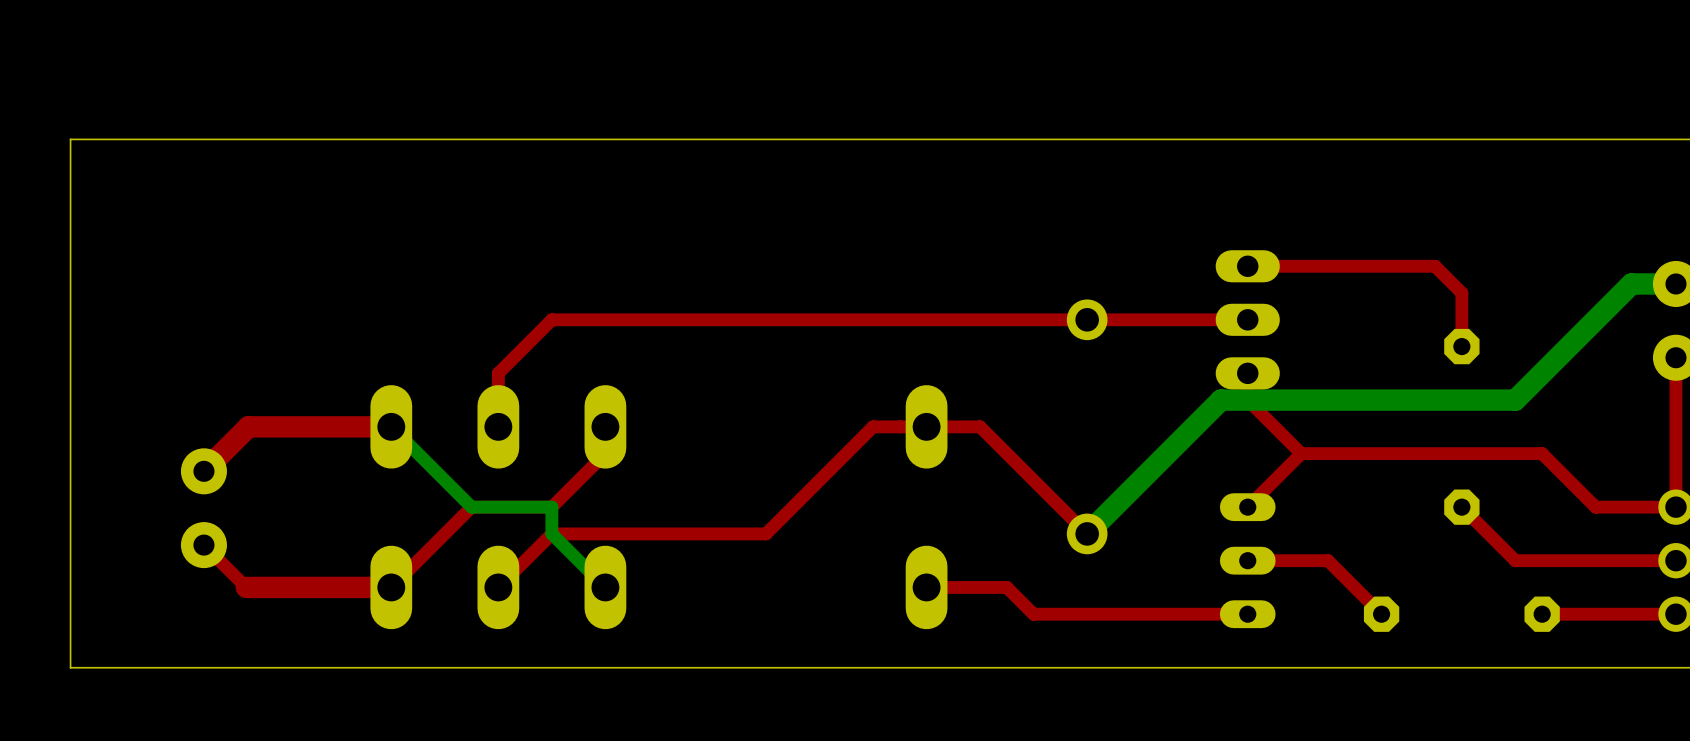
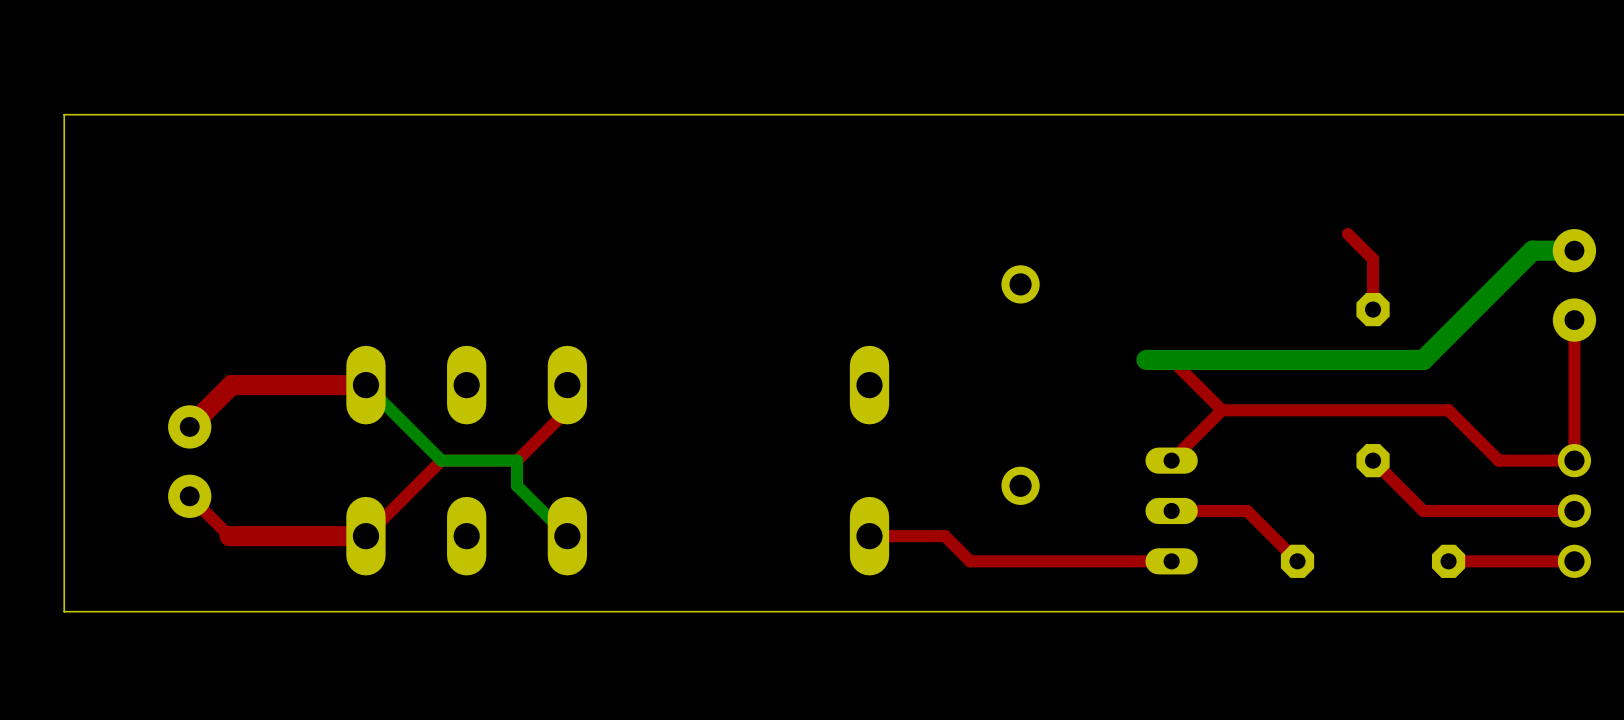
top track: (1435, 266) (1247, 266) -> none
top track: (1247, 319) (551, 319) (498, 373) (498, 426) -> none
part: (1247, 319) -> none
bottom track: (1220, 400) (1087, 533) -> none
top track: (1087, 533) (980, 426) (873, 426) (766, 533) (551, 533) (498, 587) -> none

